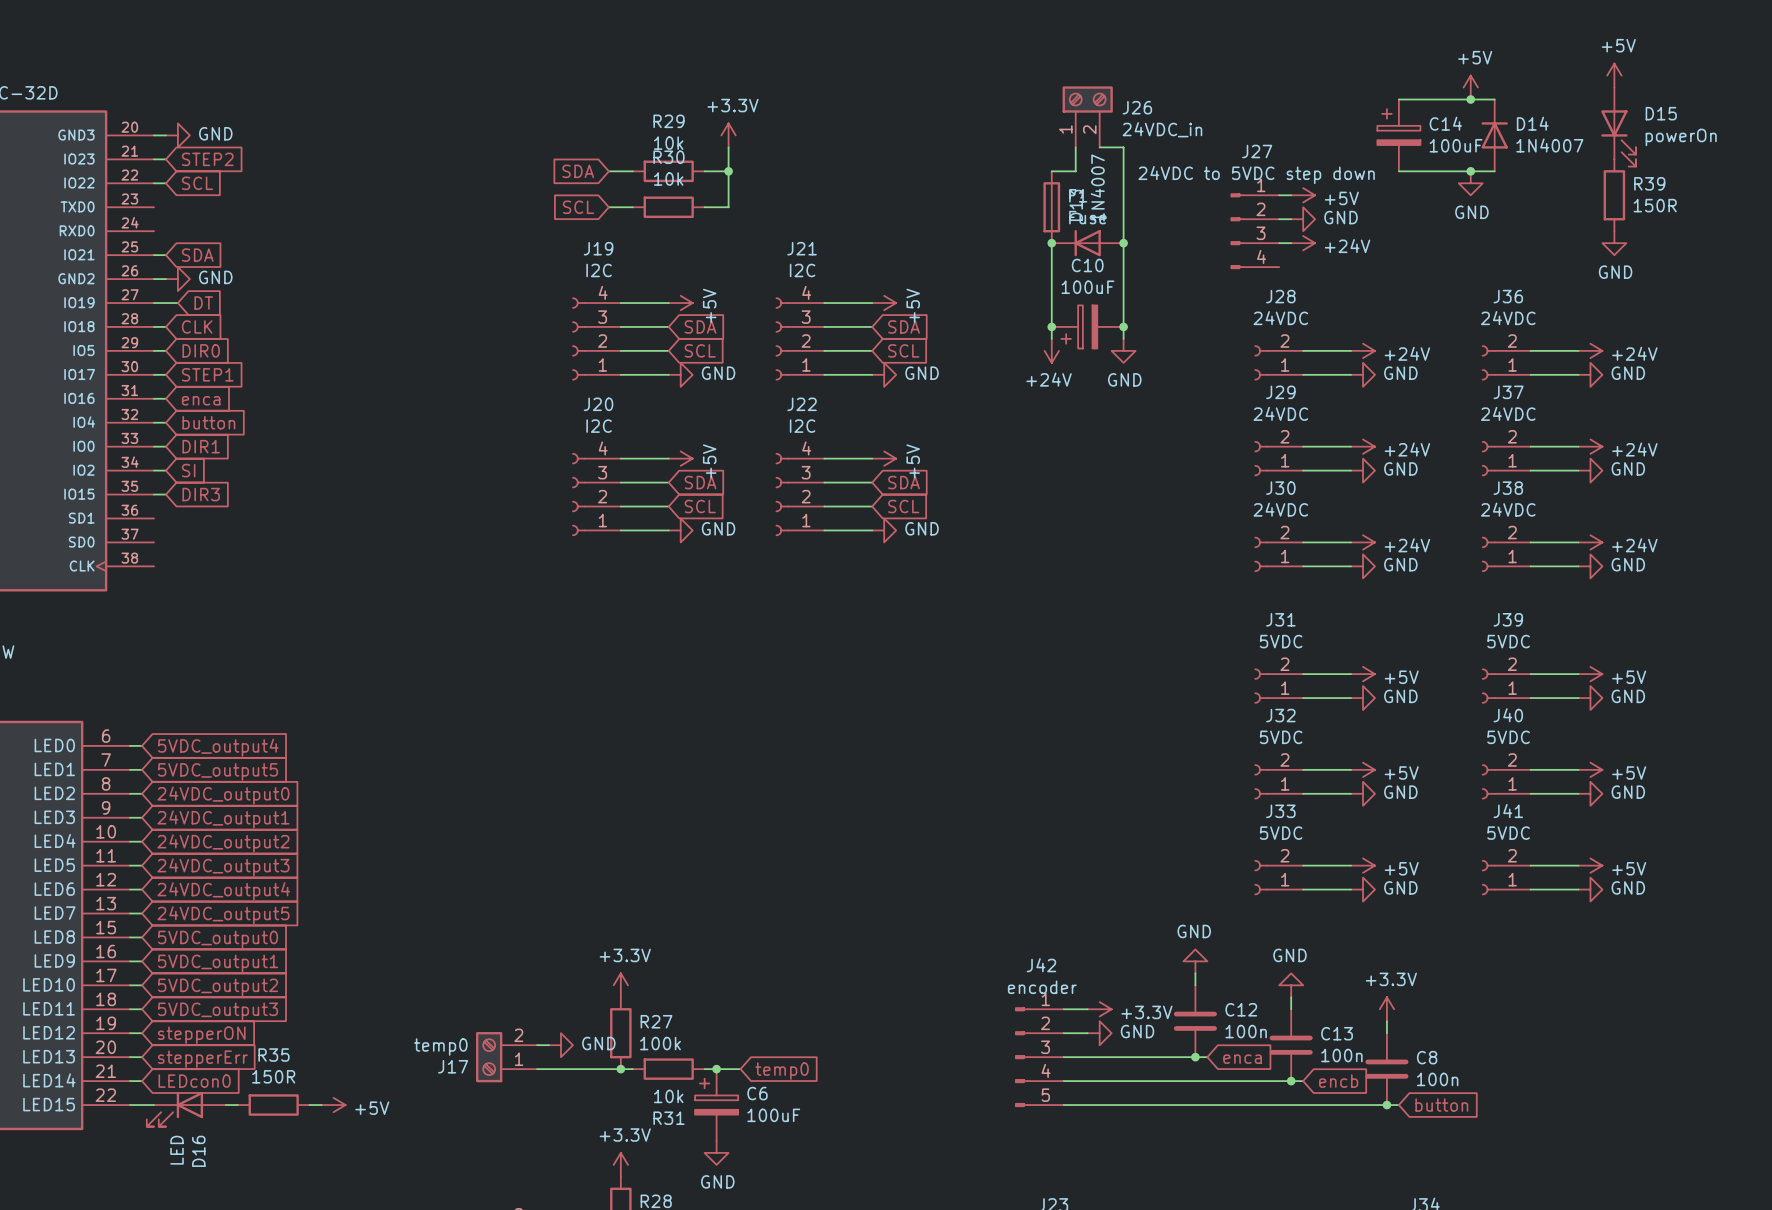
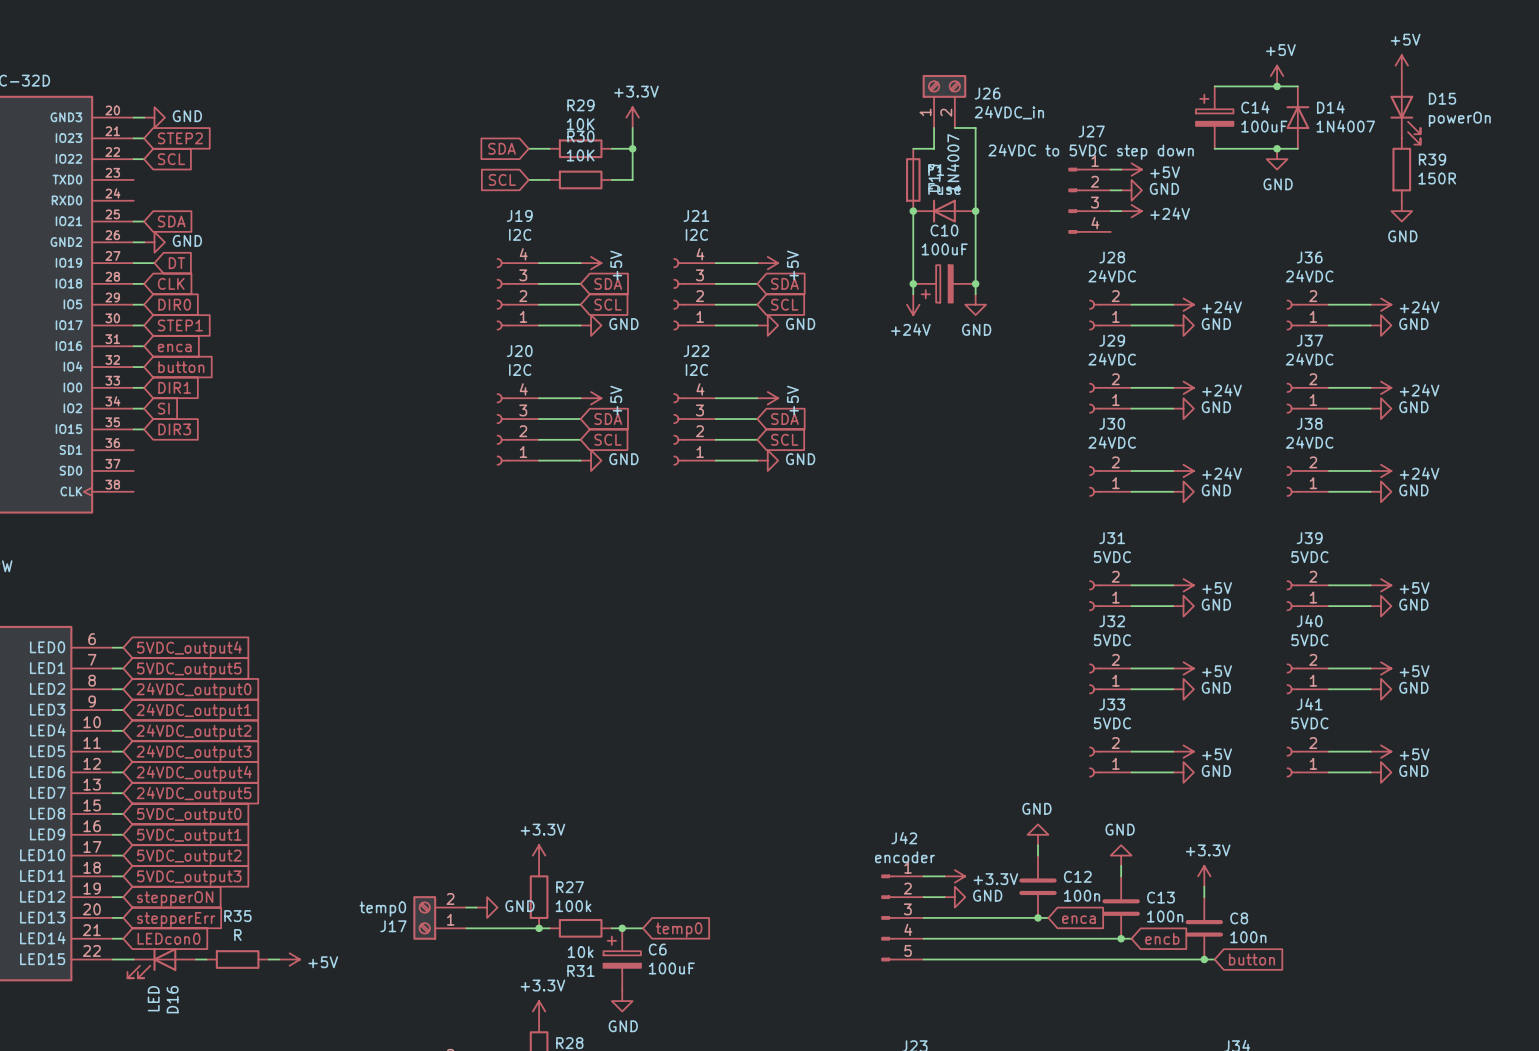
R29 value: 10k (668, 143) -> 10K (580, 124)
R30 value: 10k (668, 179) -> 10K (580, 155)
R35 value: 150R (273, 1076) -> R (237, 935)

